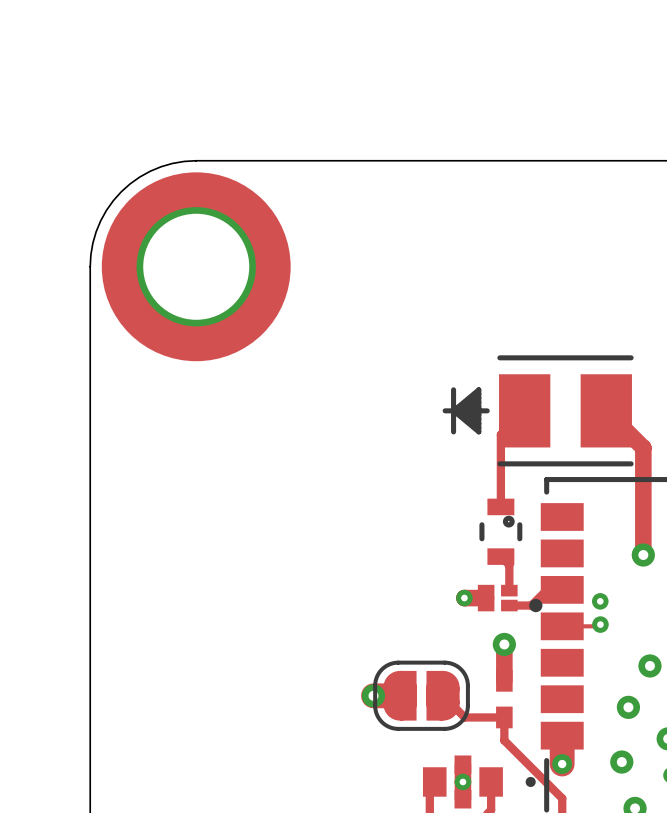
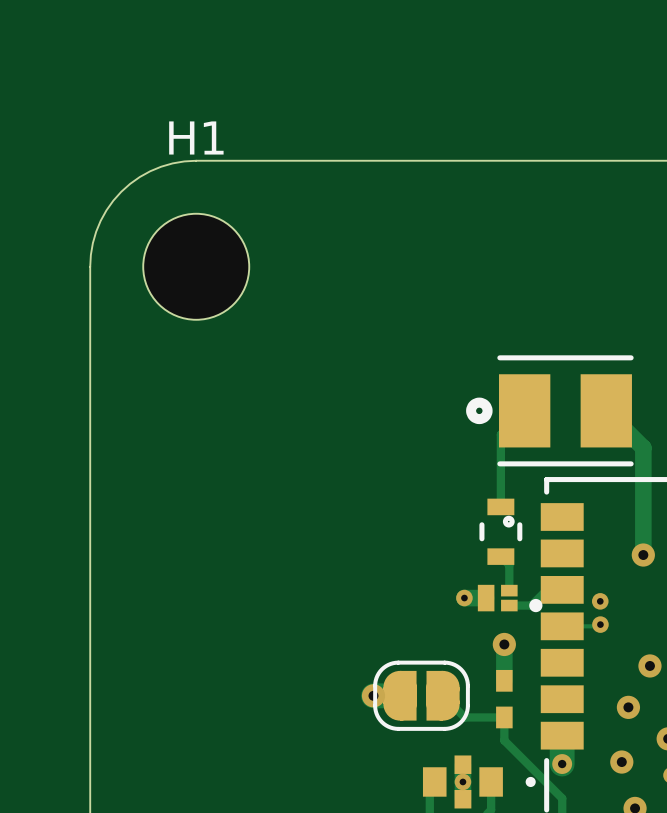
part: (196, 266) -> none
H1: none -> (196, 266)
part footprint: [442, 355, 634, 467] -> [466, 355, 634, 467]

